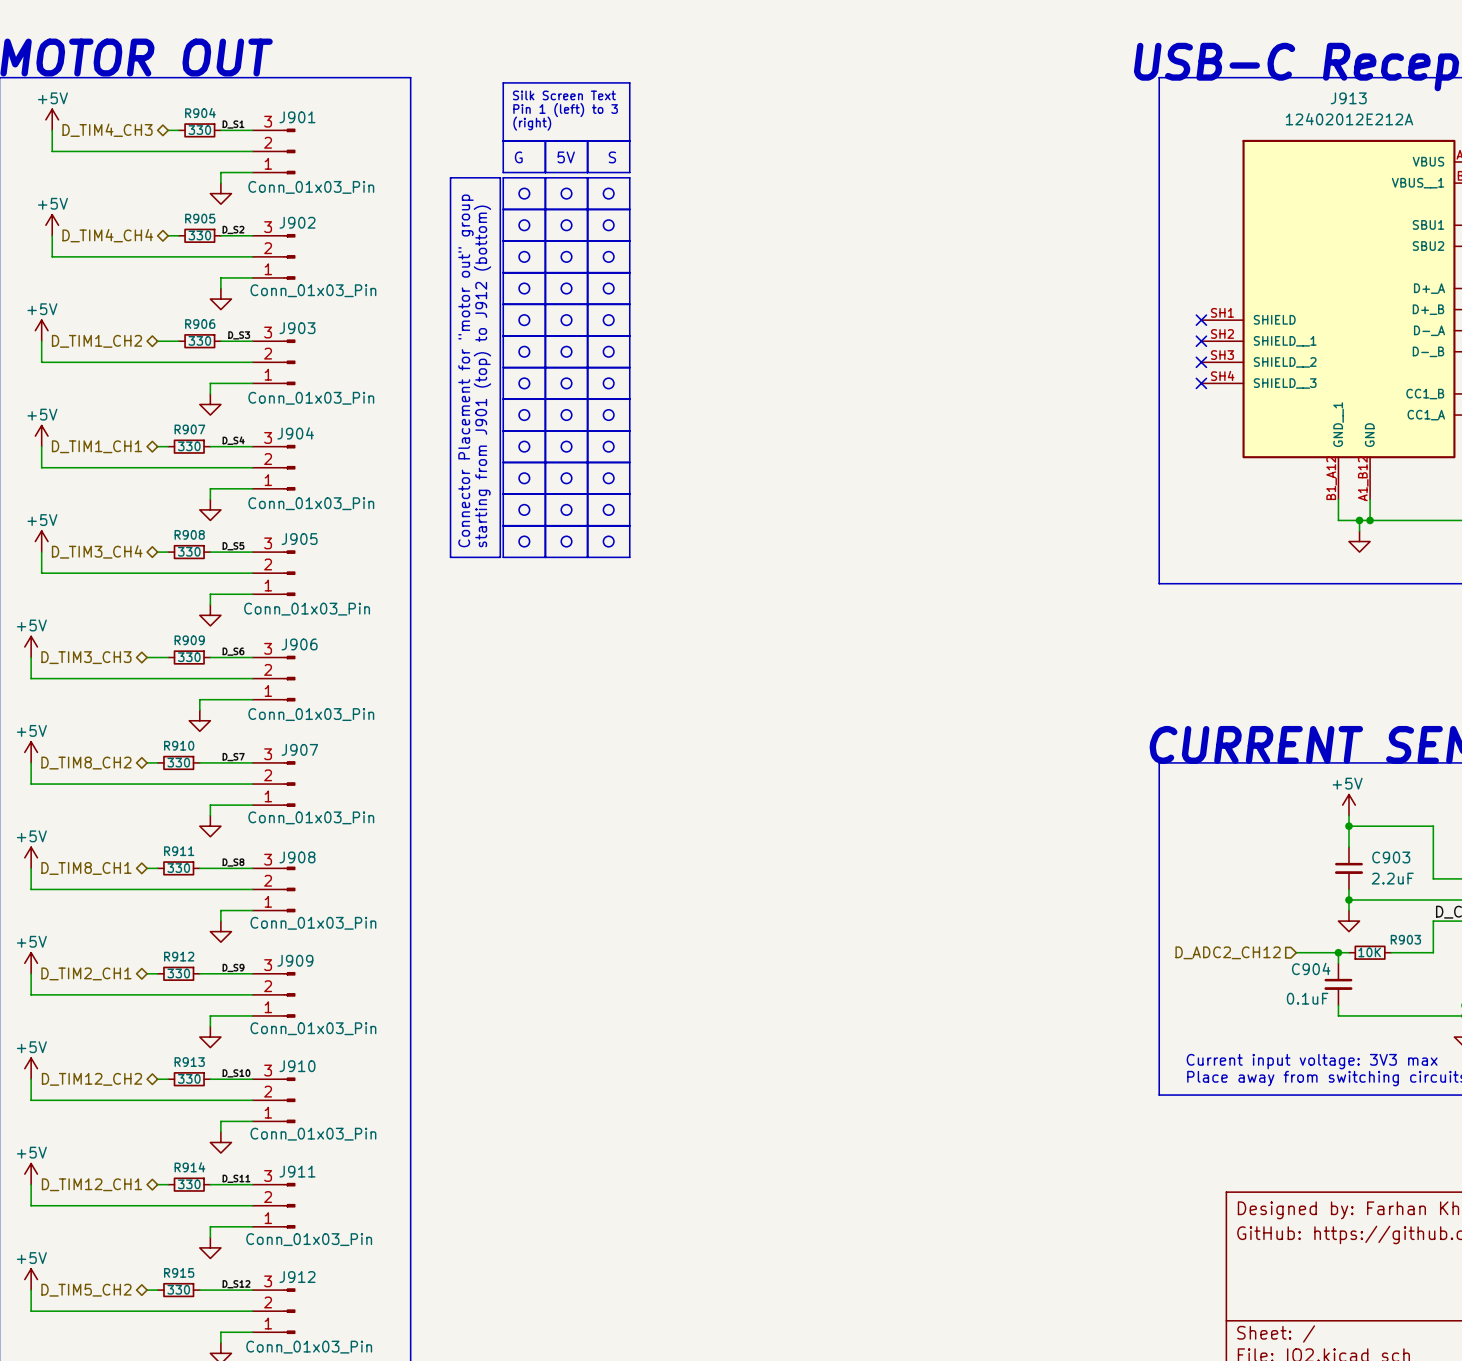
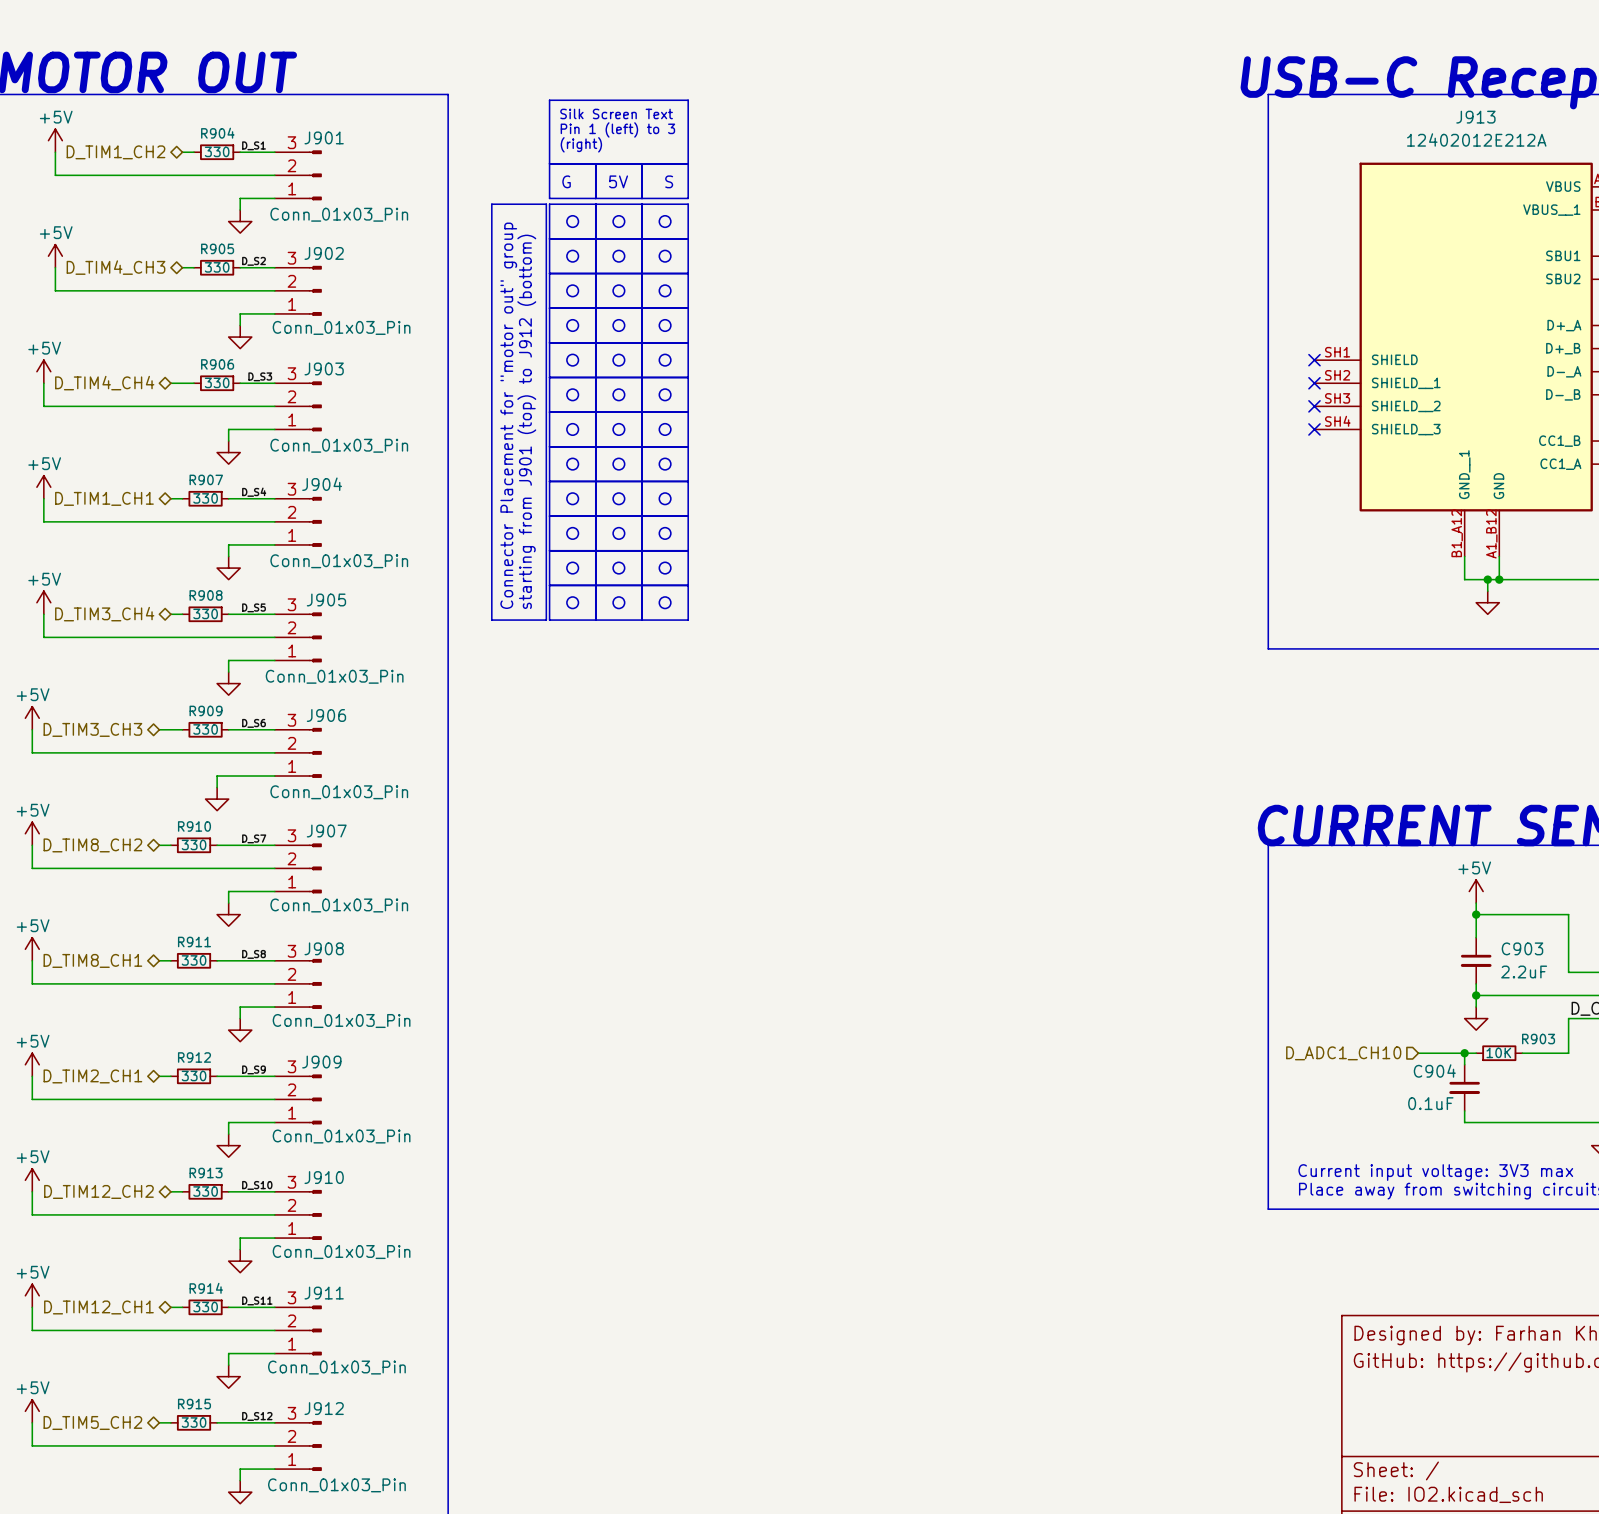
hierarchical label: D_TIM4_CH3 (107, 130) -> D_TIM1_CH2 (116, 152)
hierarchical label: D_TIM4_CH4 (107, 235) -> D_TIM4_CH3 (116, 267)
hierarchical label: D_TIM1_CH2 (96, 341) -> D_TIM4_CH4 (104, 383)
hierarchical label: D_ADC2_CH12 (1228, 952) -> D_ADC1_CH10 (1343, 1053)

